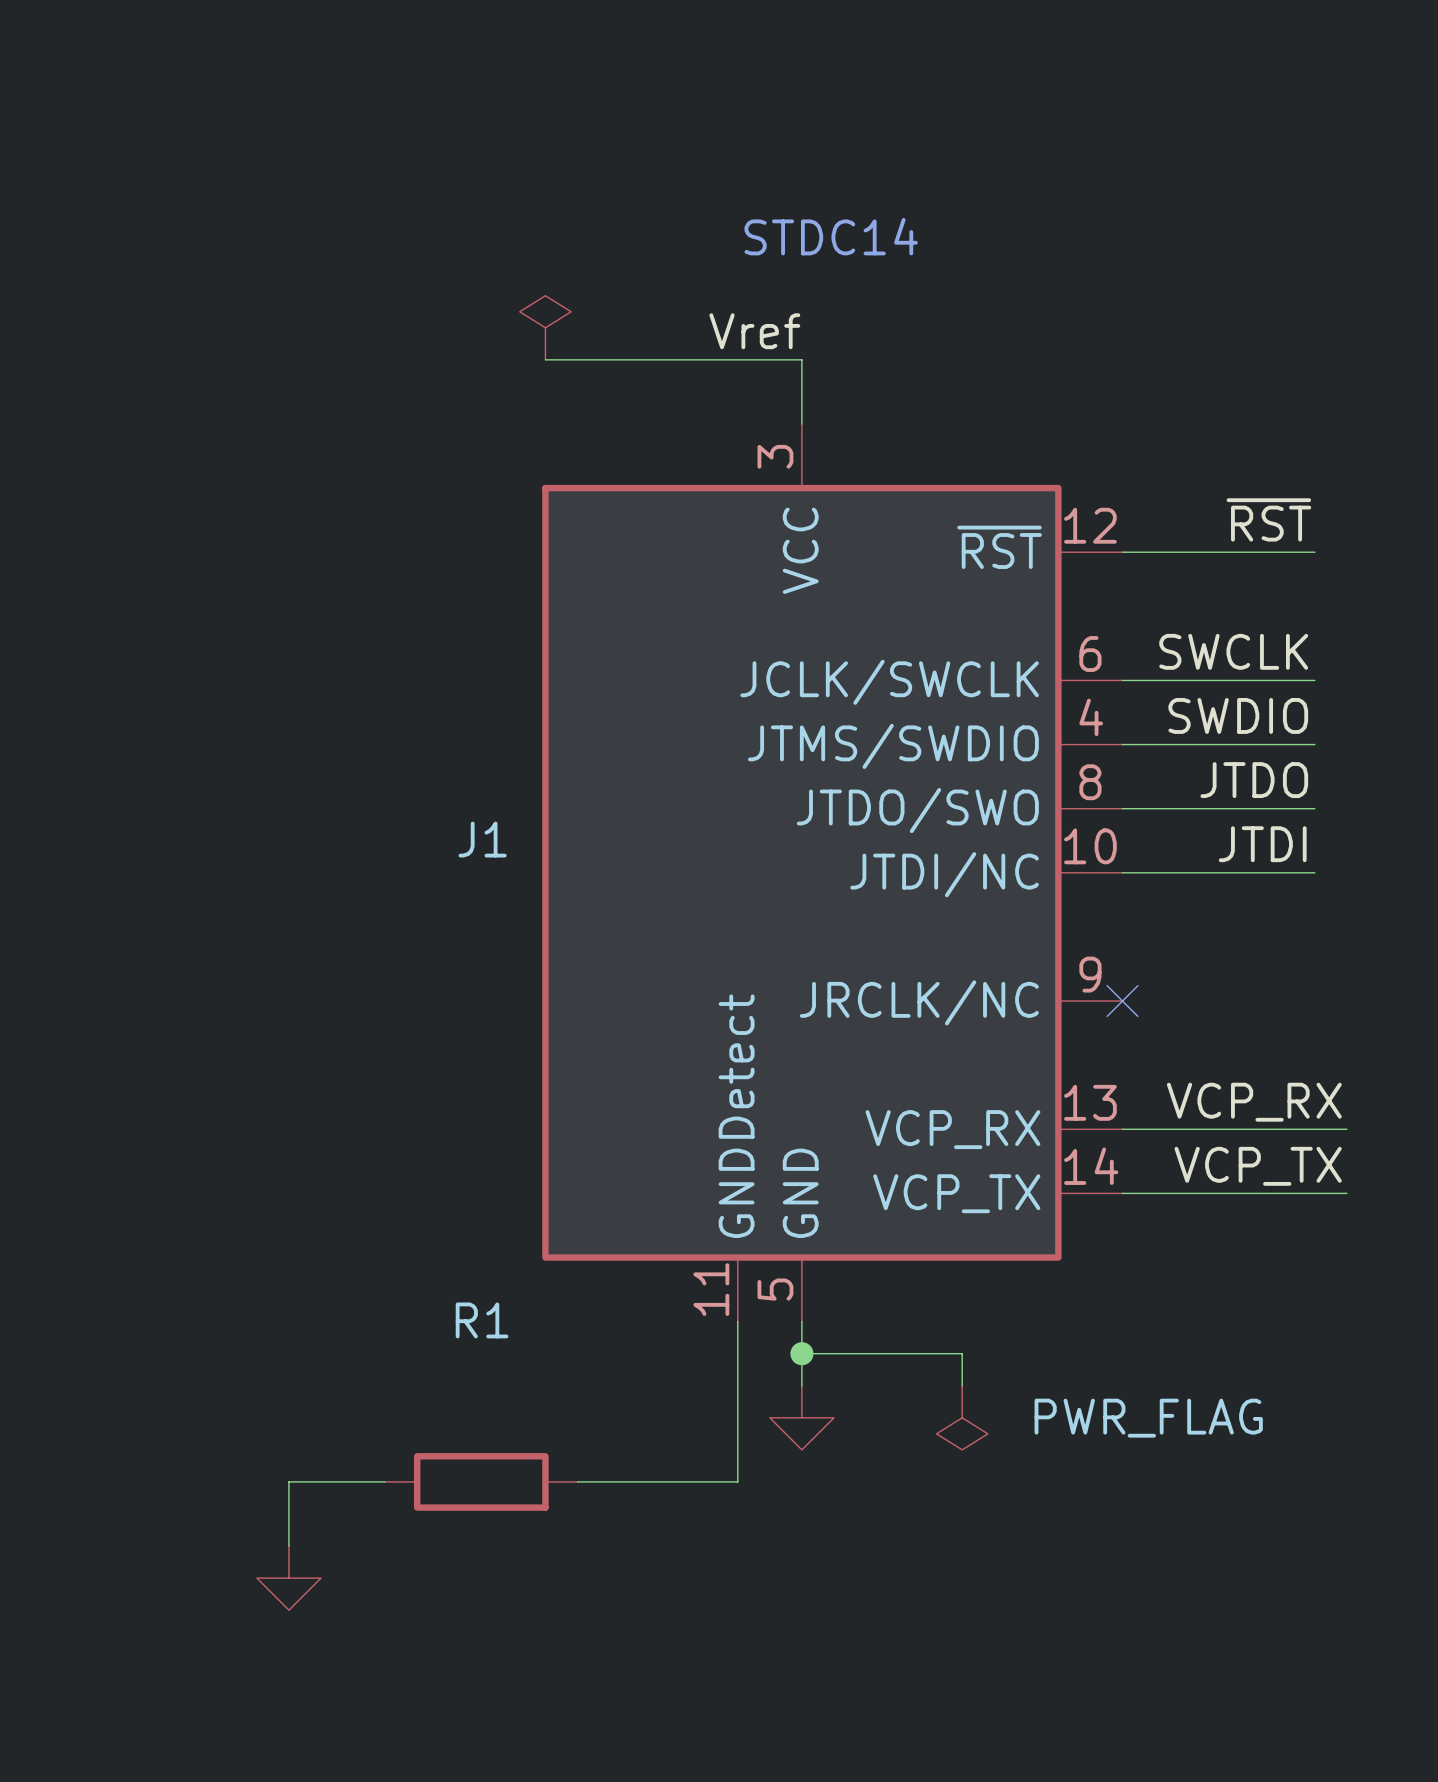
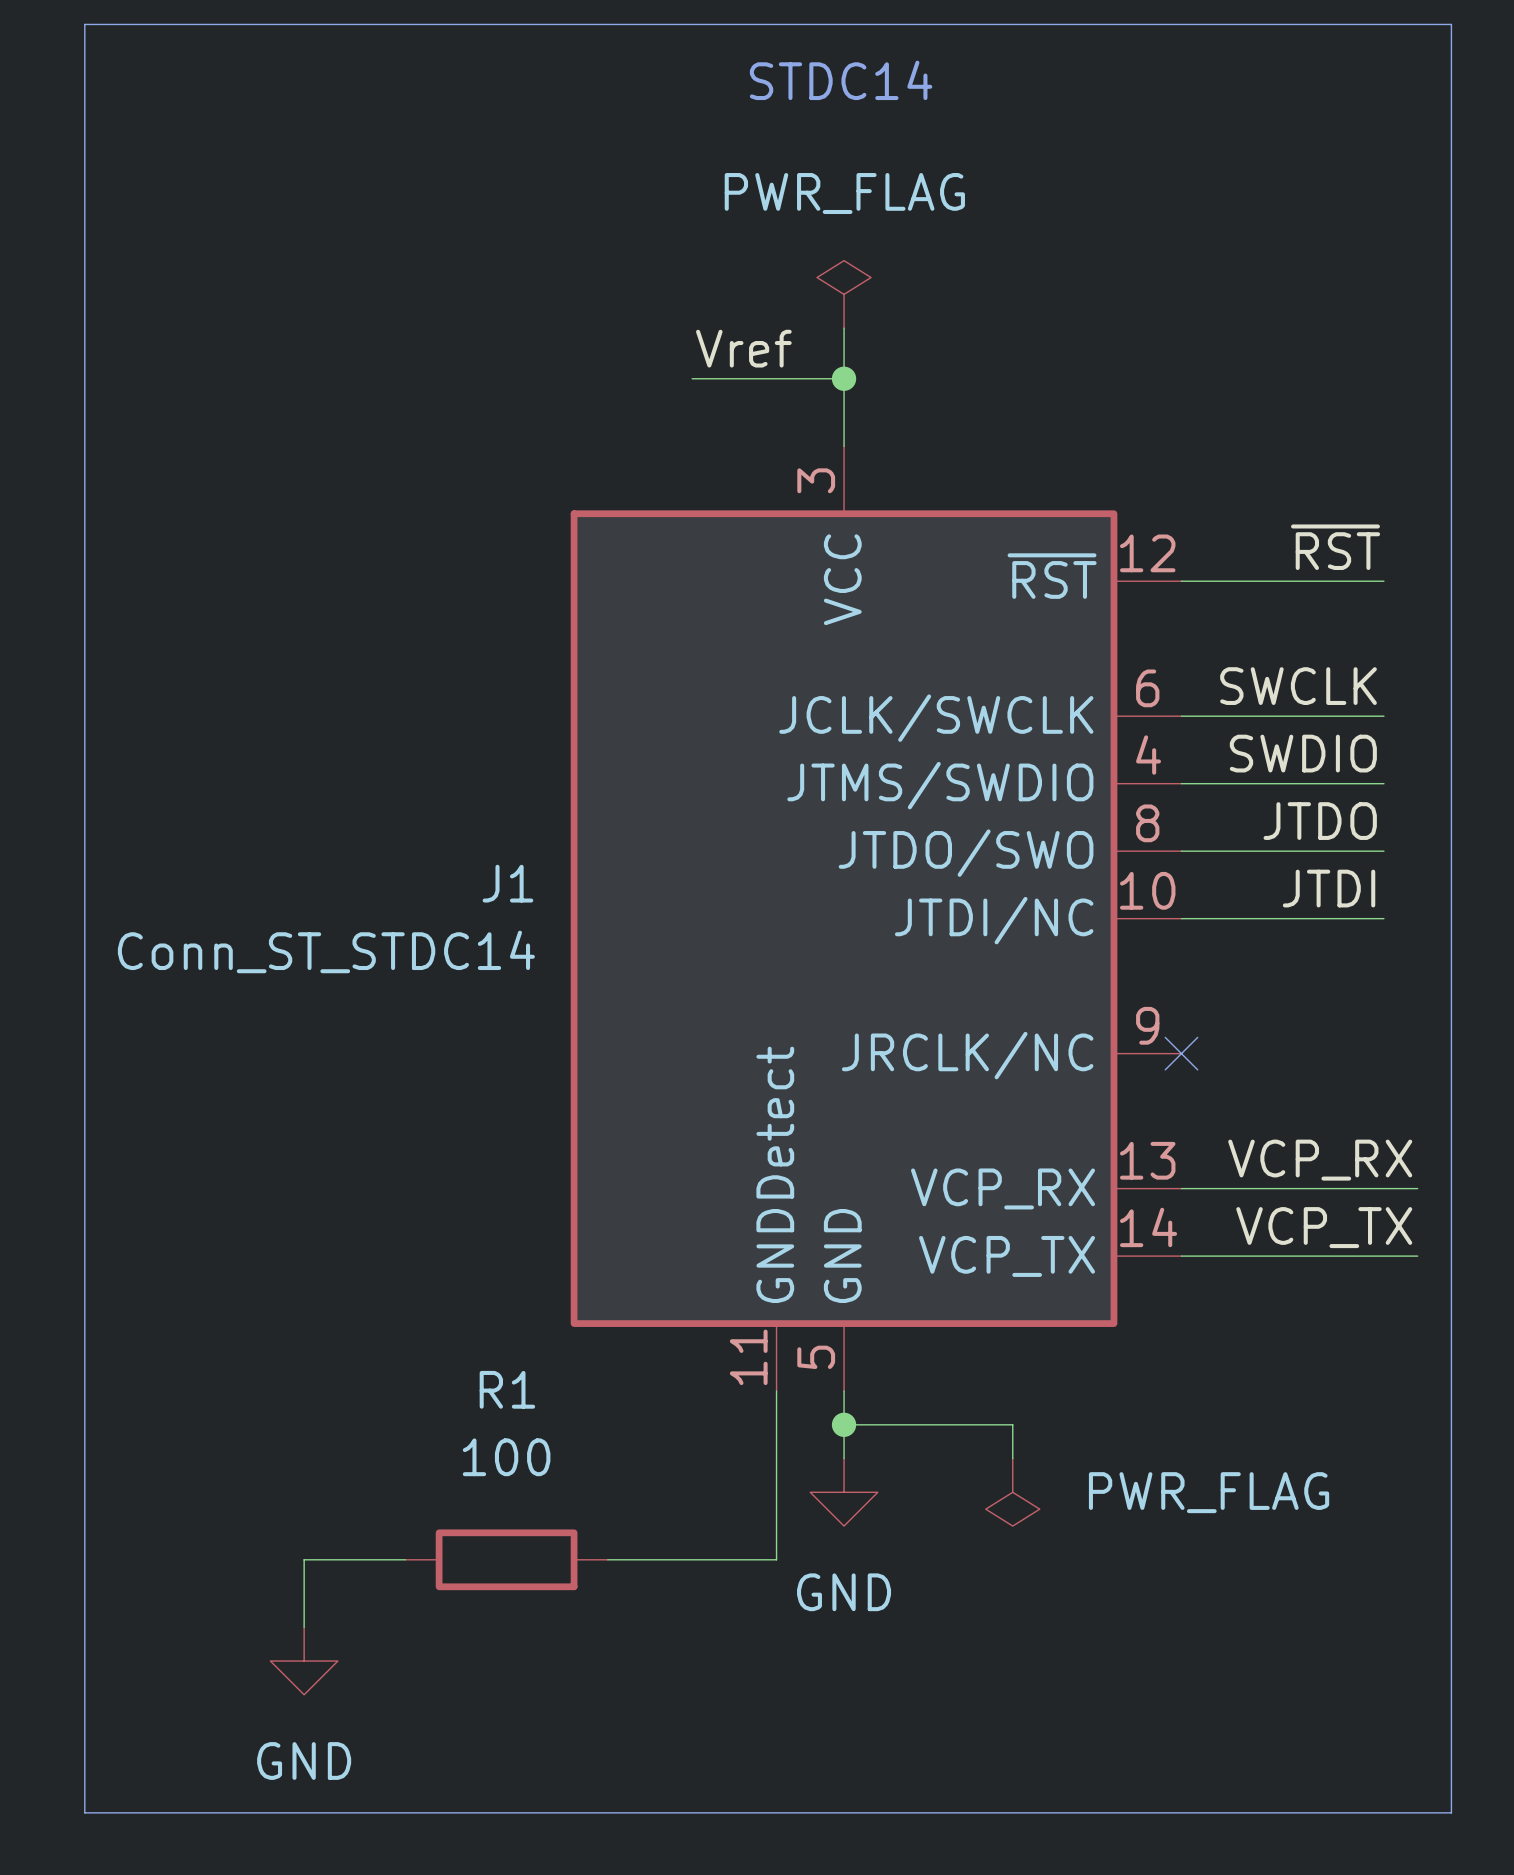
line: none -> (84, 24) (84, 1812) (1451, 1812) (1451, 24) (84, 24)
text position: STDC14 (831, 236) -> STDC14 (841, 80)
power symbol: none -> PWR_FLAG (844, 294)
wire: none -> (844, 328) (844, 378)
power symbol: (545, 327) -> none
label position: Vref (754, 331) -> Vref (743, 348)
wire: (545, 359) (657, 359) -> none
junction: none -> (844, 378)
J1 value: none -> Conn_ST_STDC14 (326, 951)
R1 value: none -> 100 (506, 1457)
power symbol text: none -> GND (844, 1592)
power symbol text: none -> GND (304, 1760)

